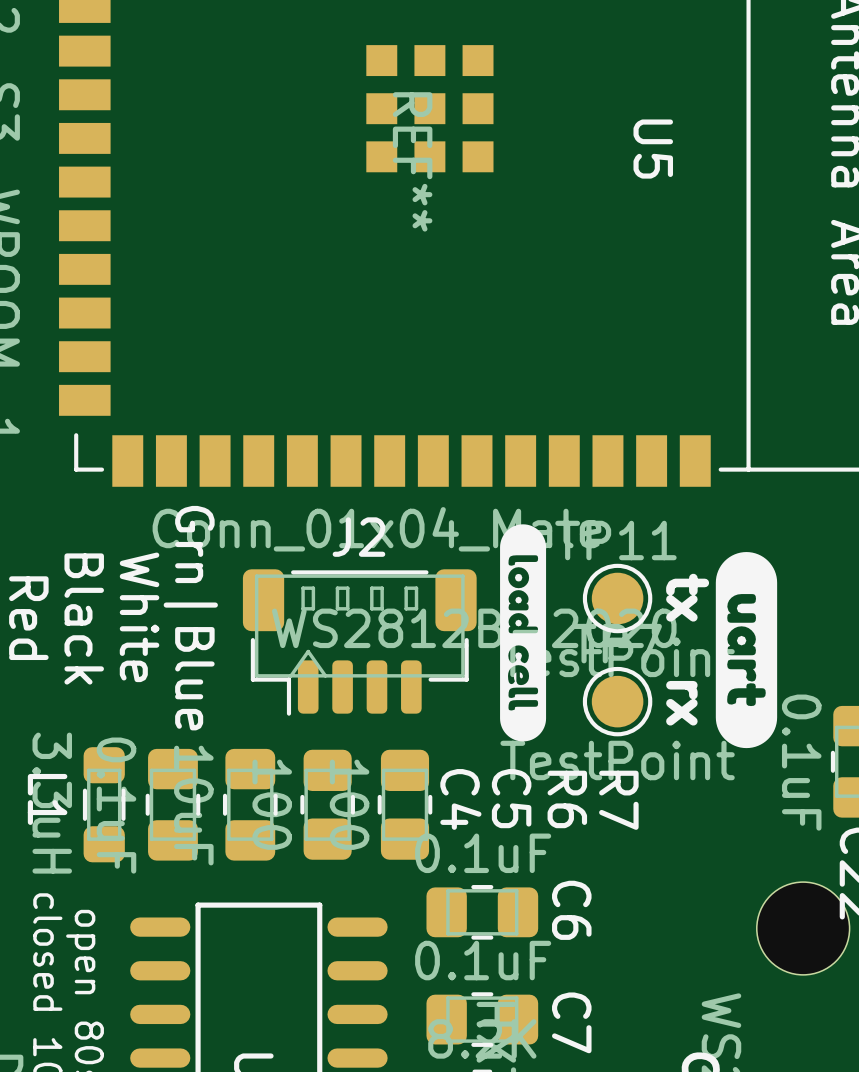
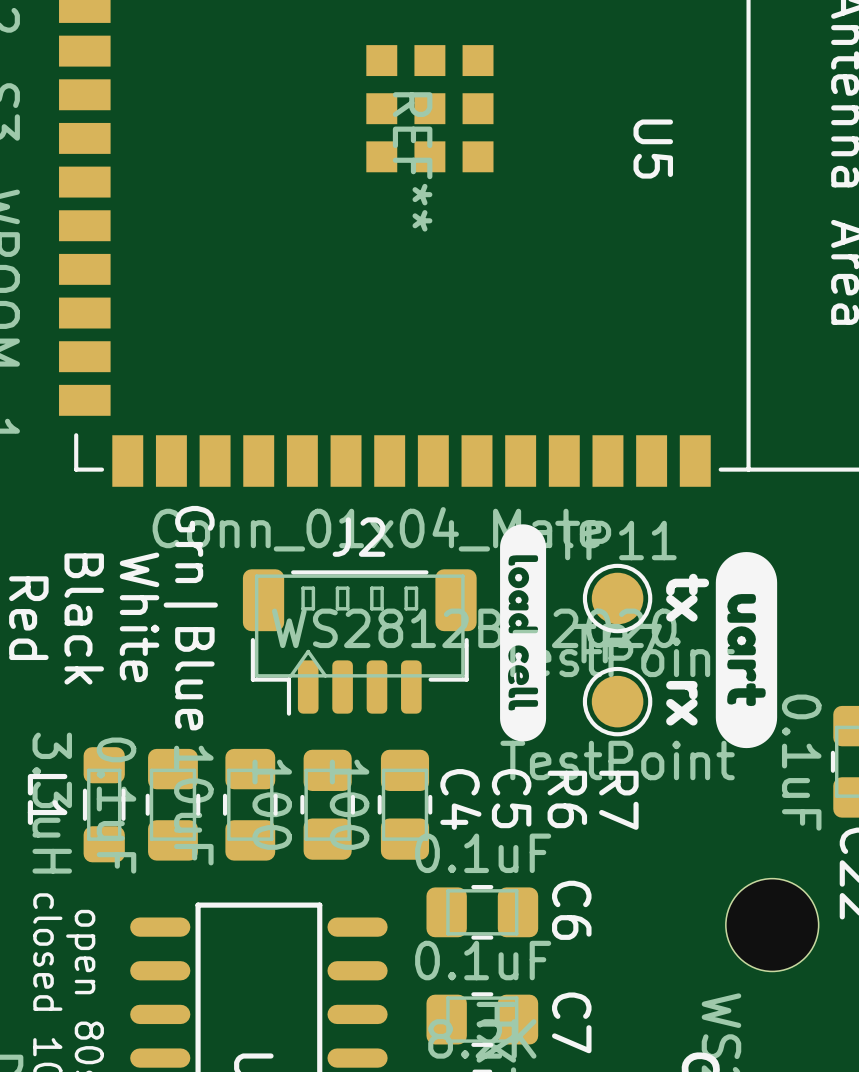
part position: (803, 928) -> (772, 925)

